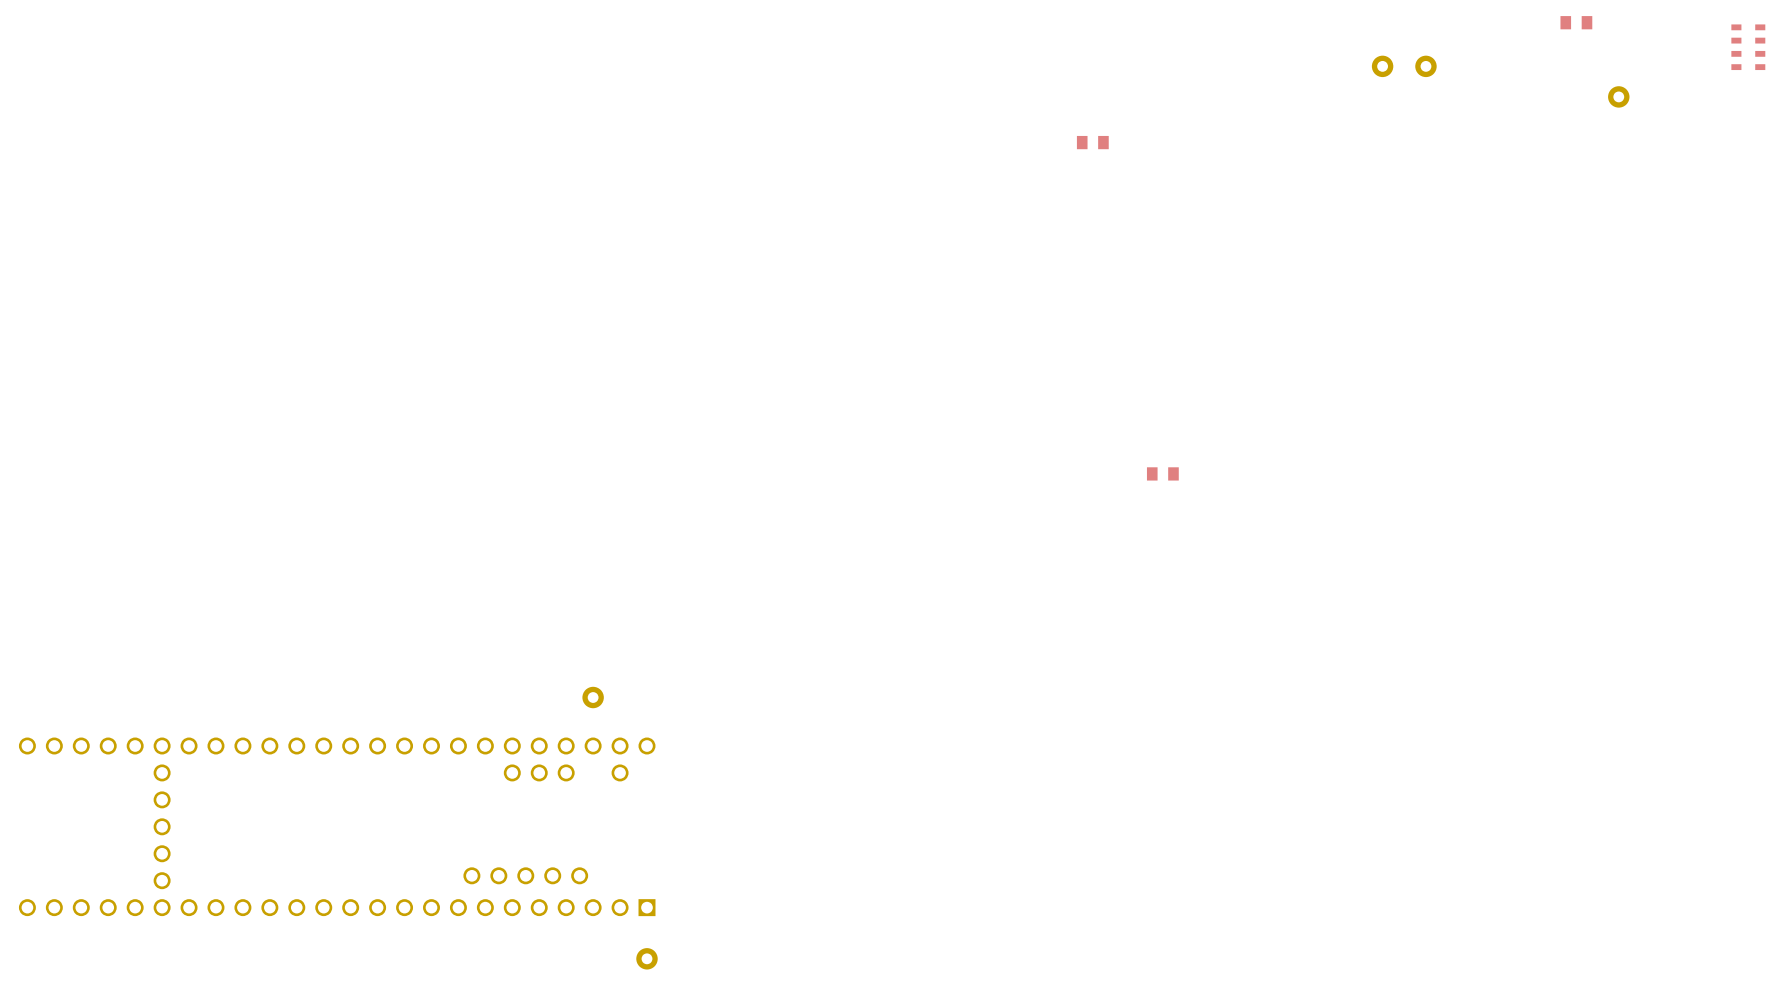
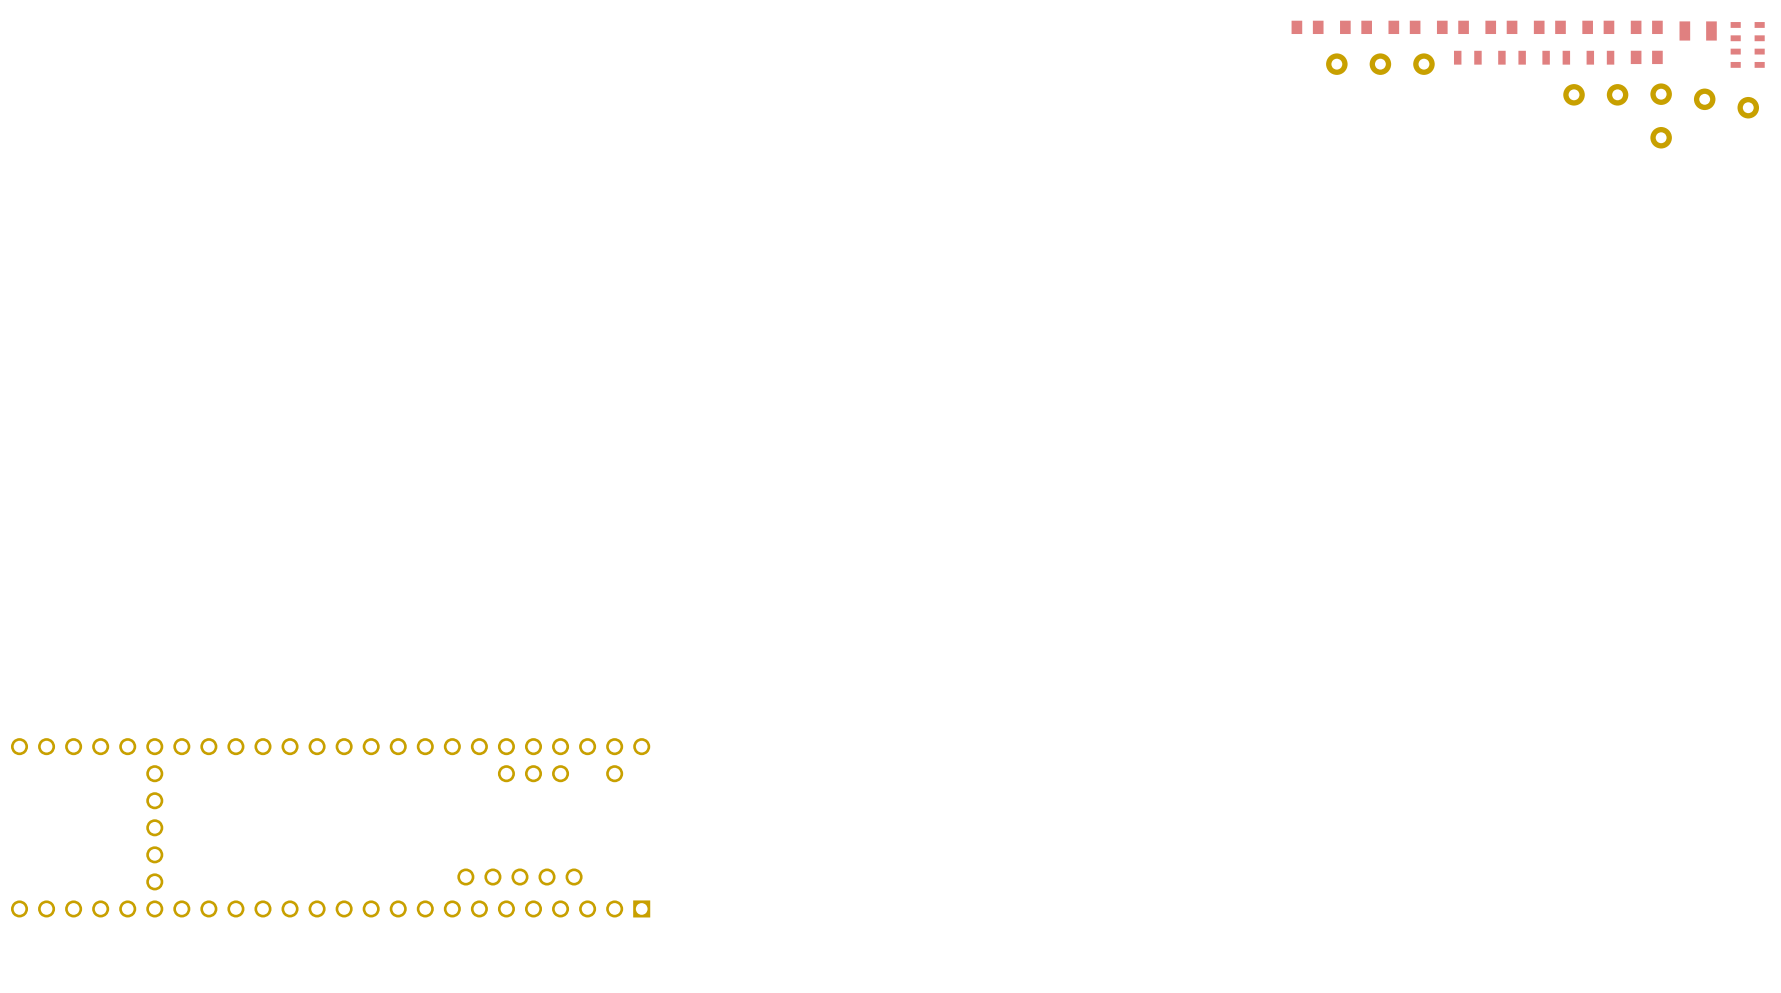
part: (1576, 22) -> none
part: none -> (1307, 27)
part: none -> (1356, 27)
part: none -> (1404, 27)
part: none -> (1452, 27)
part: none -> (1501, 27)
part: none -> (1549, 27)
part: none -> (1598, 27)
part: none -> (1646, 27)
part: none -> (1698, 30)
part: none -> (1467, 57)
part: none -> (1512, 57)
part: none -> (1556, 57)
part: none -> (1600, 57)
part: none -> (1646, 57)
part: none -> (1336, 64)
part: none -> (1574, 94)
part: none -> (1661, 94)
part: none -> (1704, 99)
part: none -> (1748, 107)
part: none -> (1661, 137)
part: (1092, 142) -> none
part: (1162, 473) -> none
part: (593, 697) -> none
part: (647, 958) -> none

